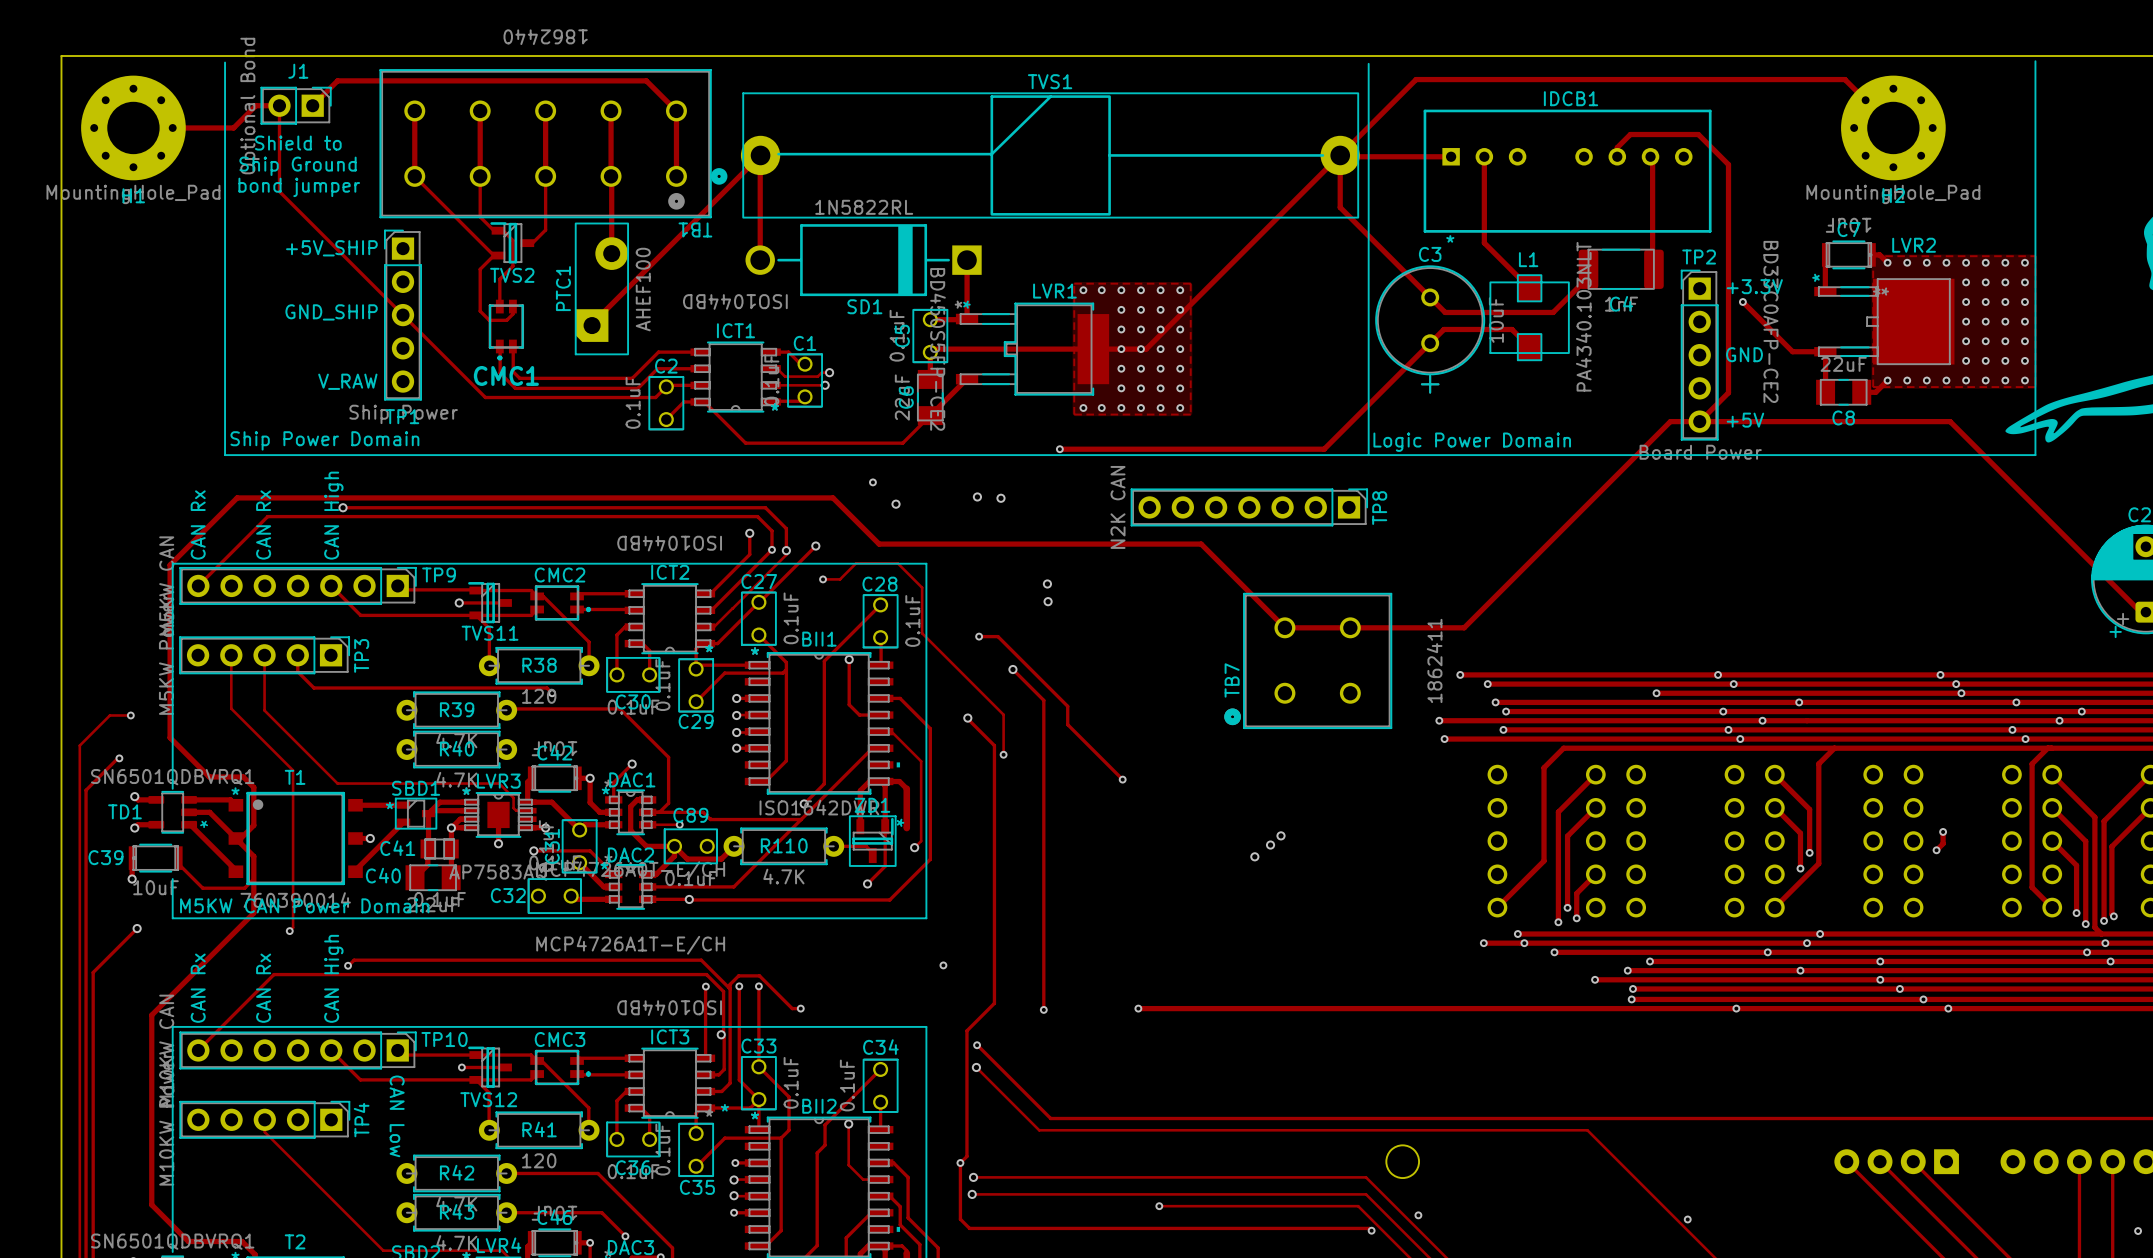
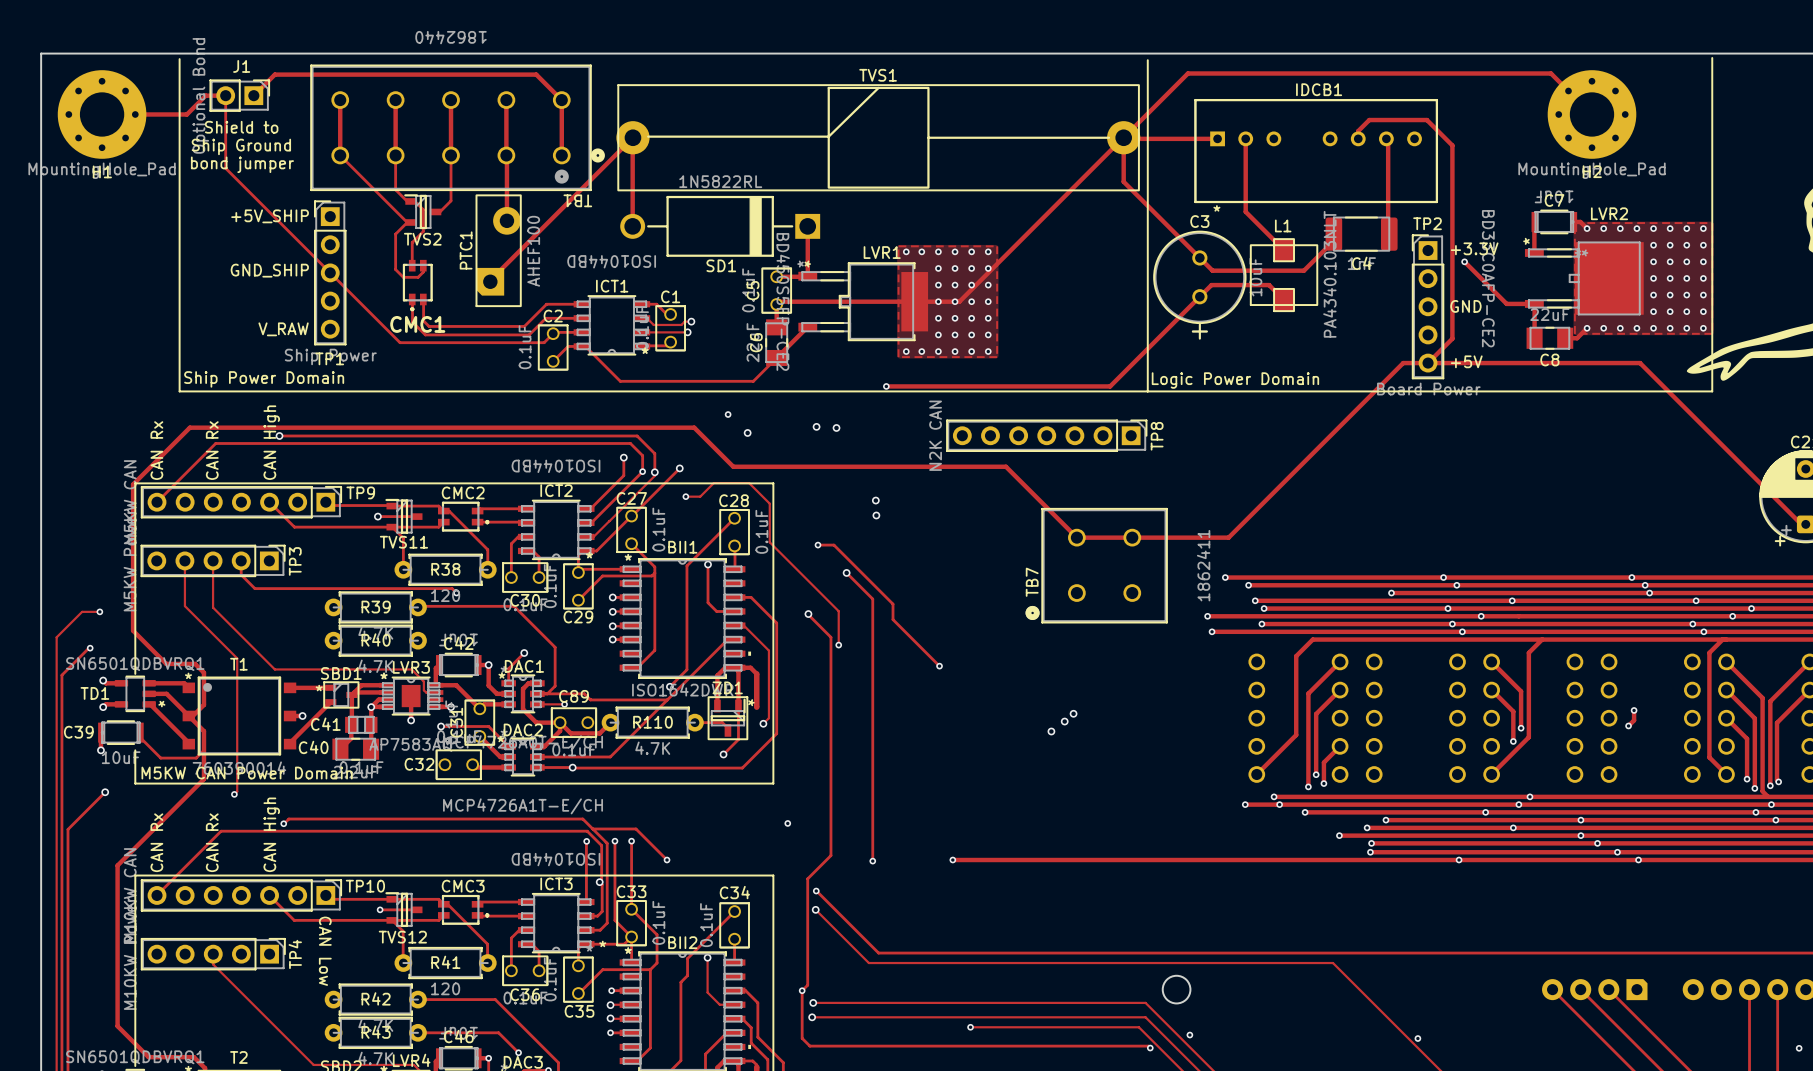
track: (730, 988) (730, 984) (738, 975) (759, 975) (792, 1008) (800, 1008) -> (592, 828) (636, 828) (667, 860)

